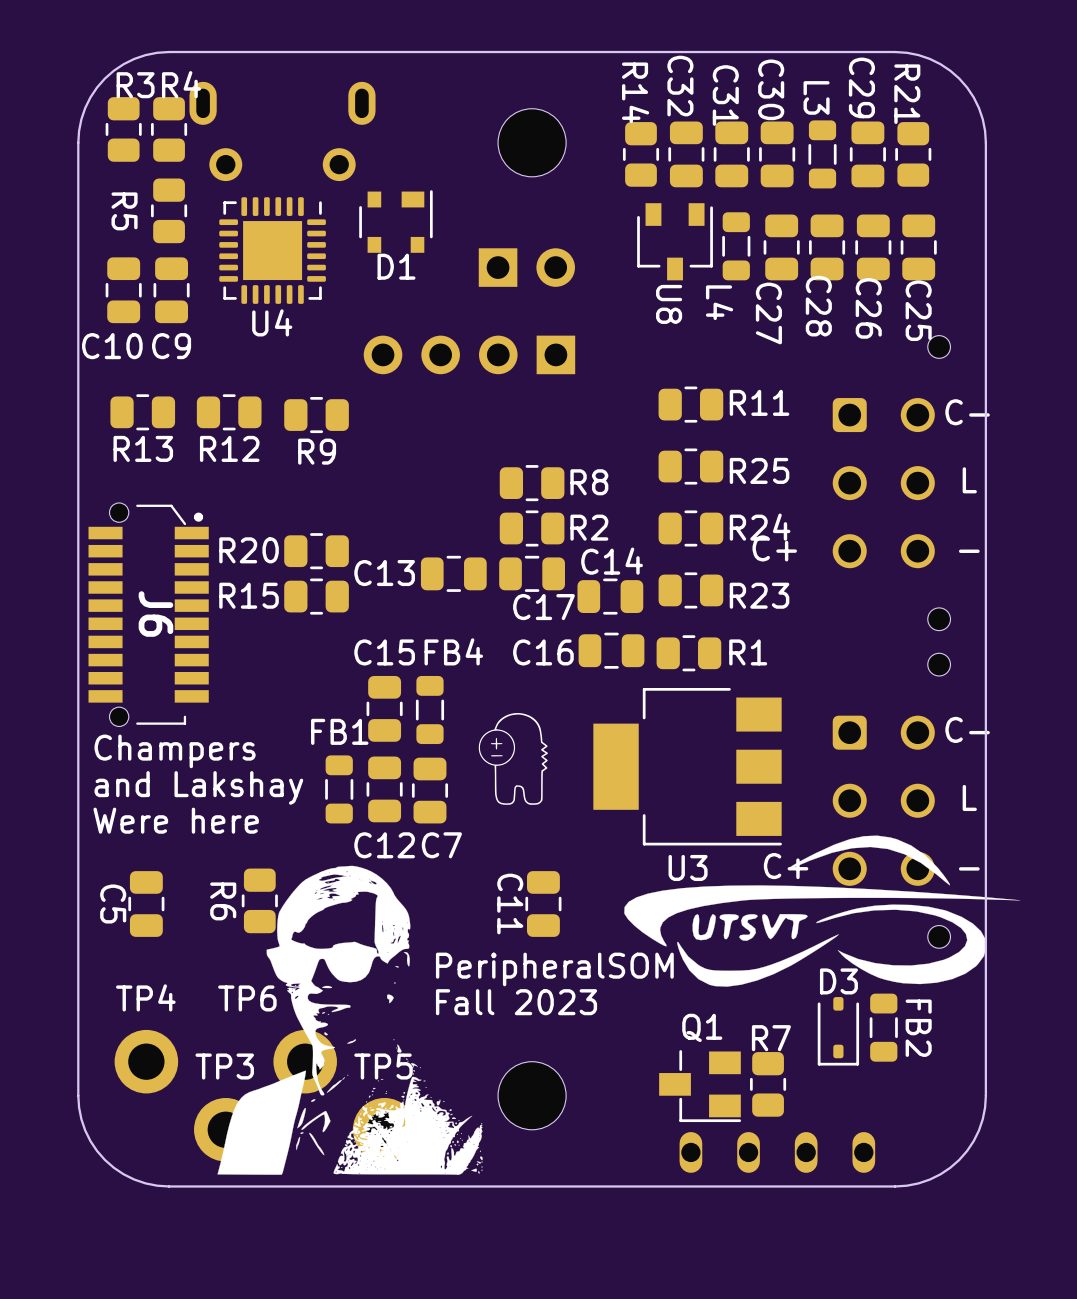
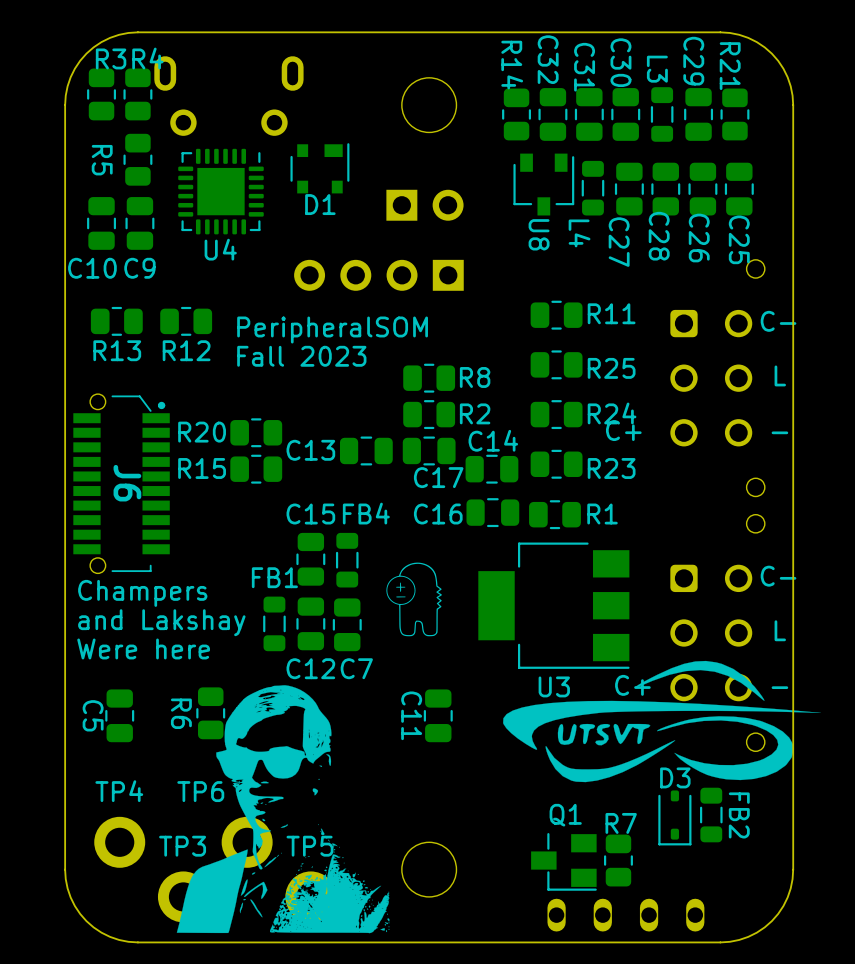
R9: (316, 415) -> none
text position: PeripheralSOM (554, 969) -> PeripheralSOM (332, 330)
text position: Fall 2023 (516, 1002) -> Fall 2023 (301, 356)

